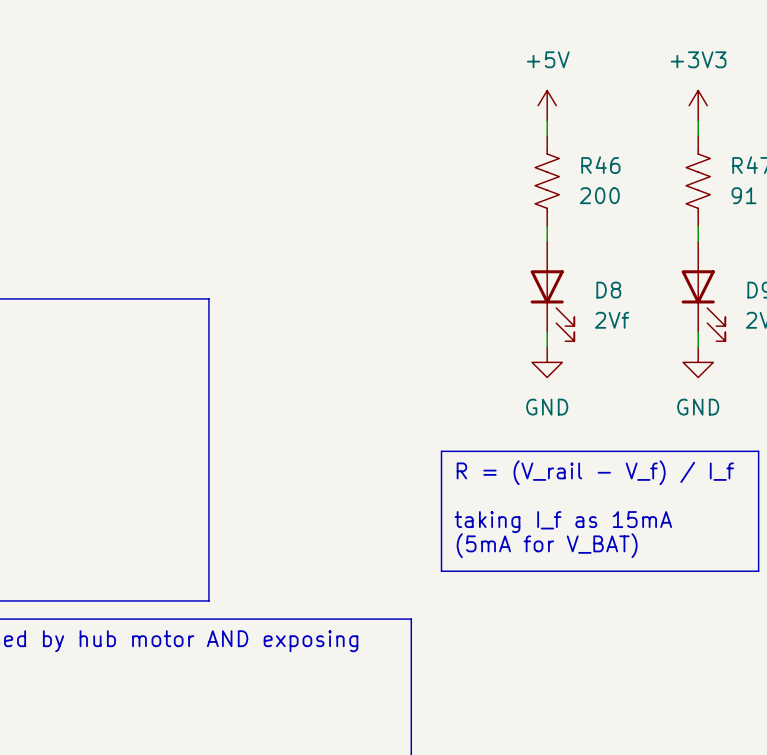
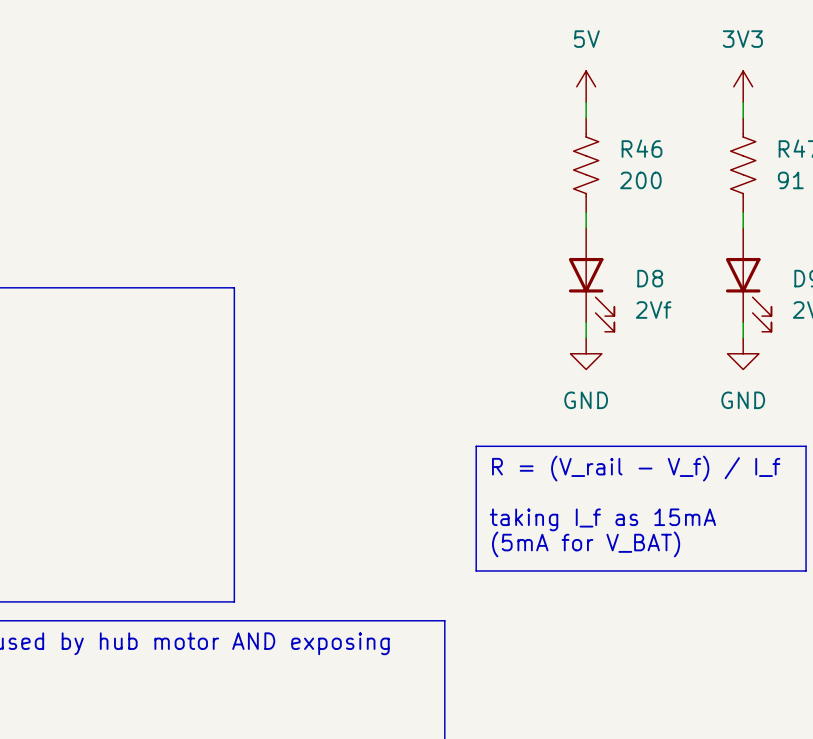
power symbol: +5V (547, 105) -> 5V (586, 86)
power symbol: +3V3 (698, 105) -> 3V3 (743, 86)

